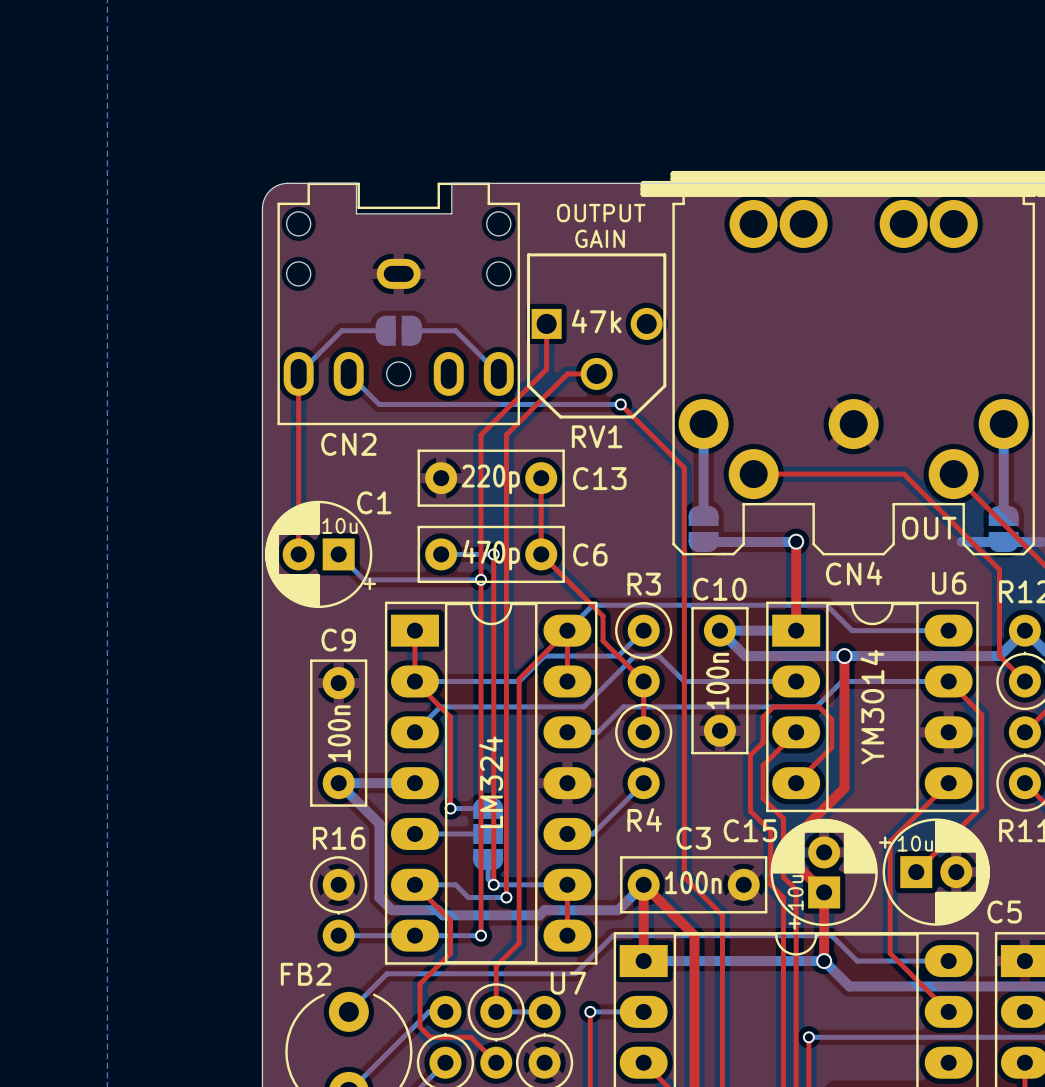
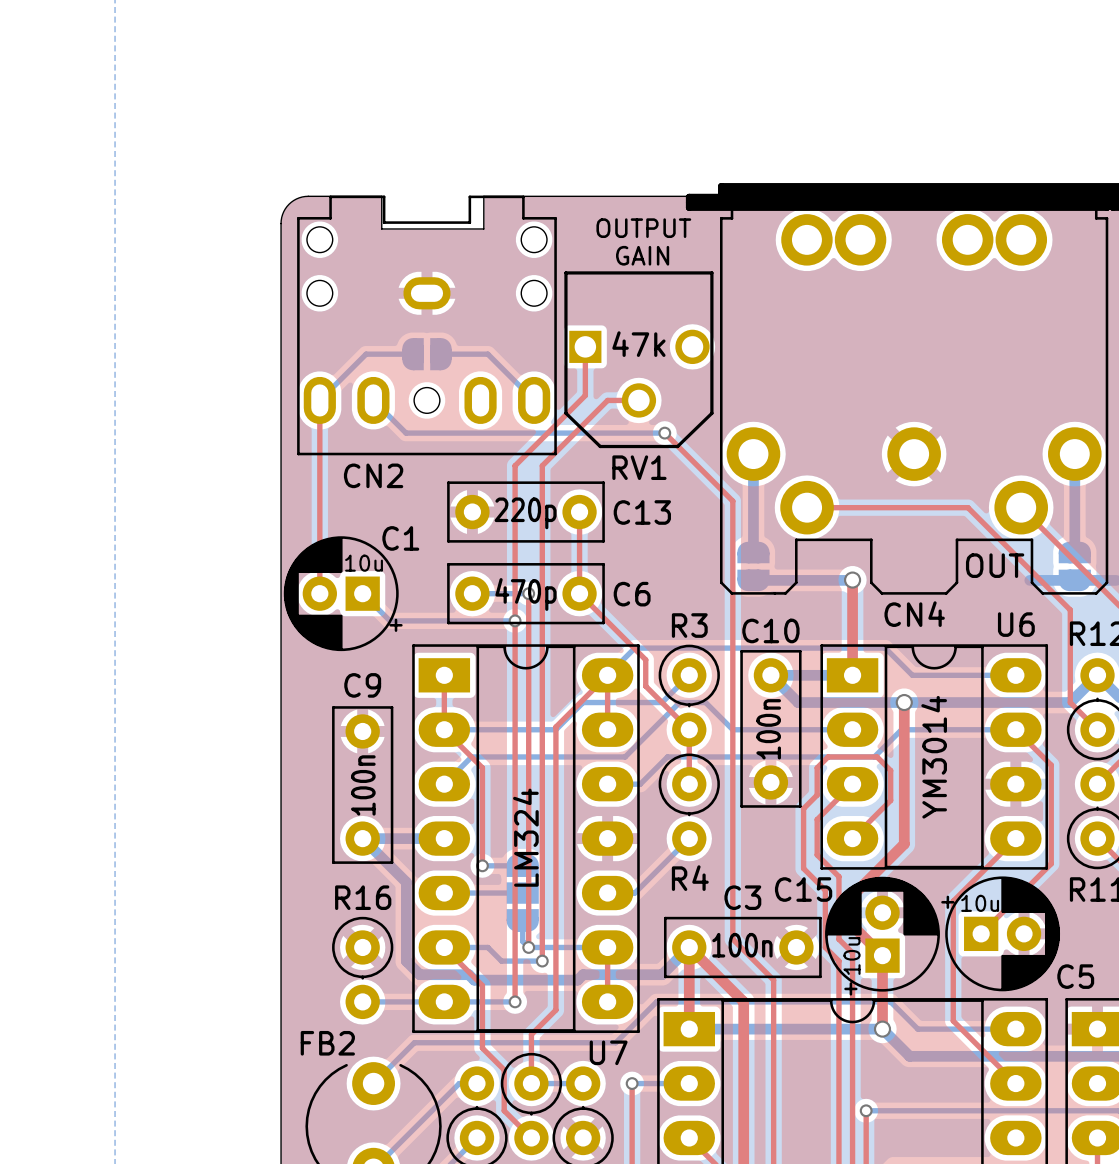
top track: (450, 953) (420, 983) (420, 1027) (430, 1037) (470, 1037) -> (482, 1020) (482, 1048) (504, 1069) (504, 1110)

